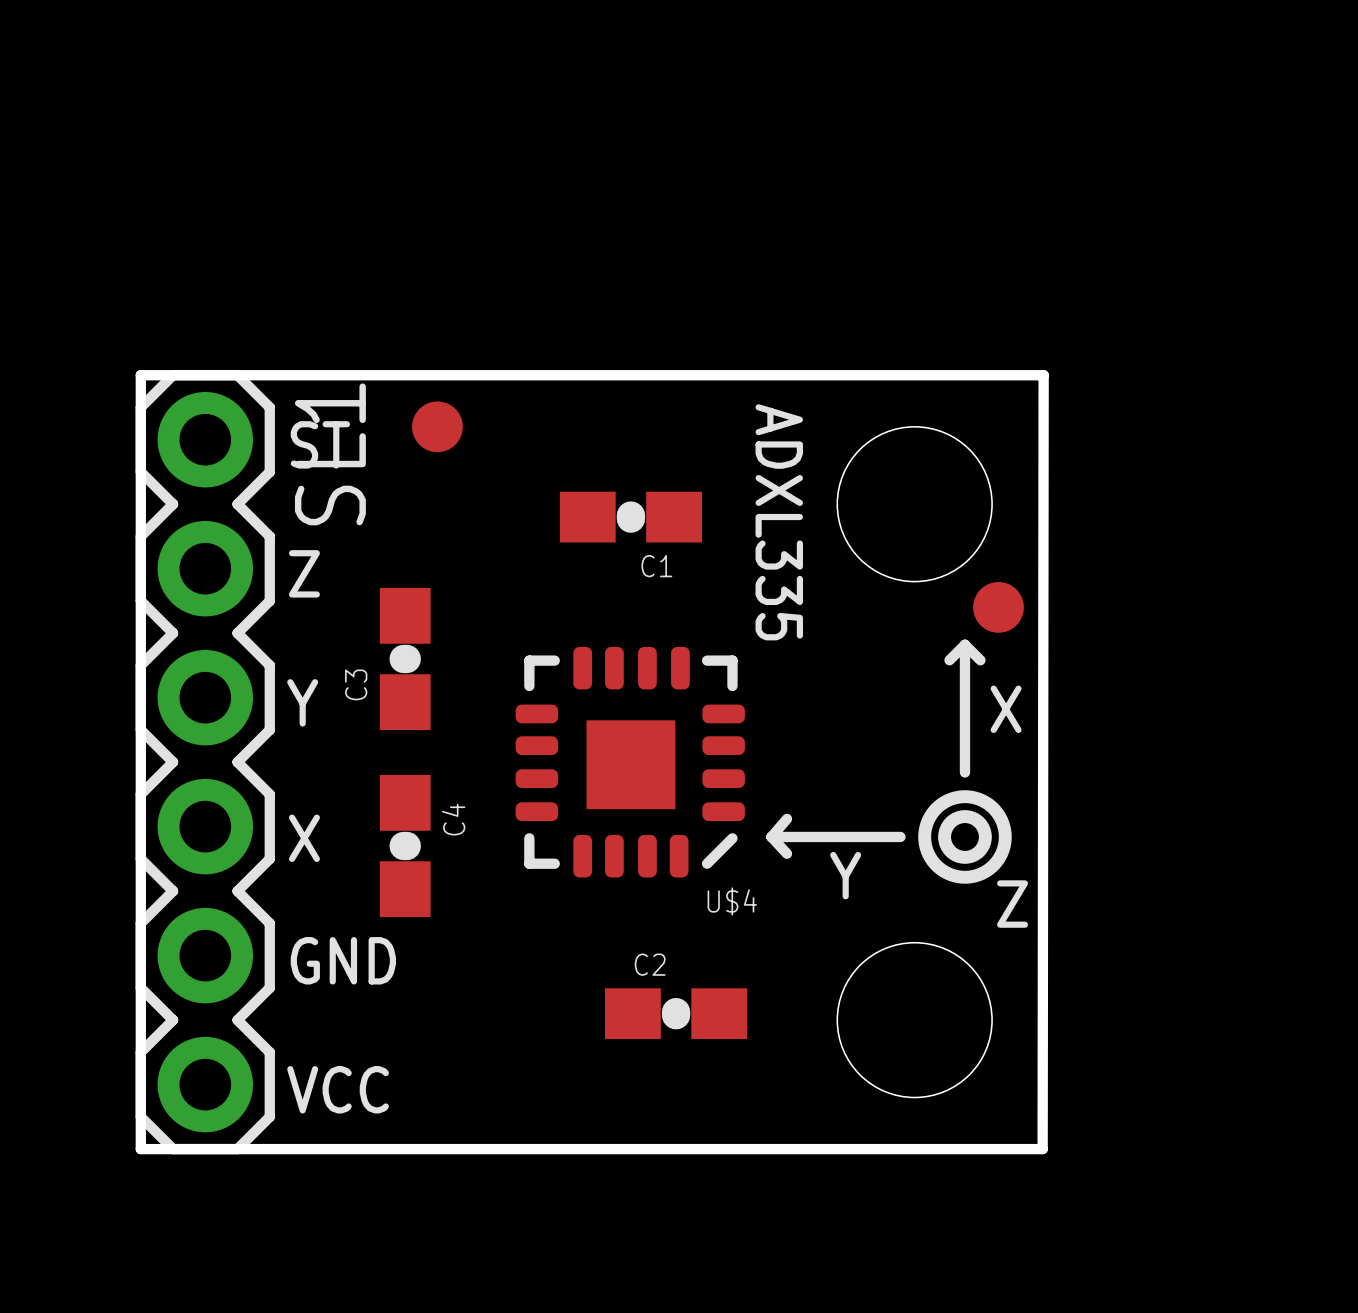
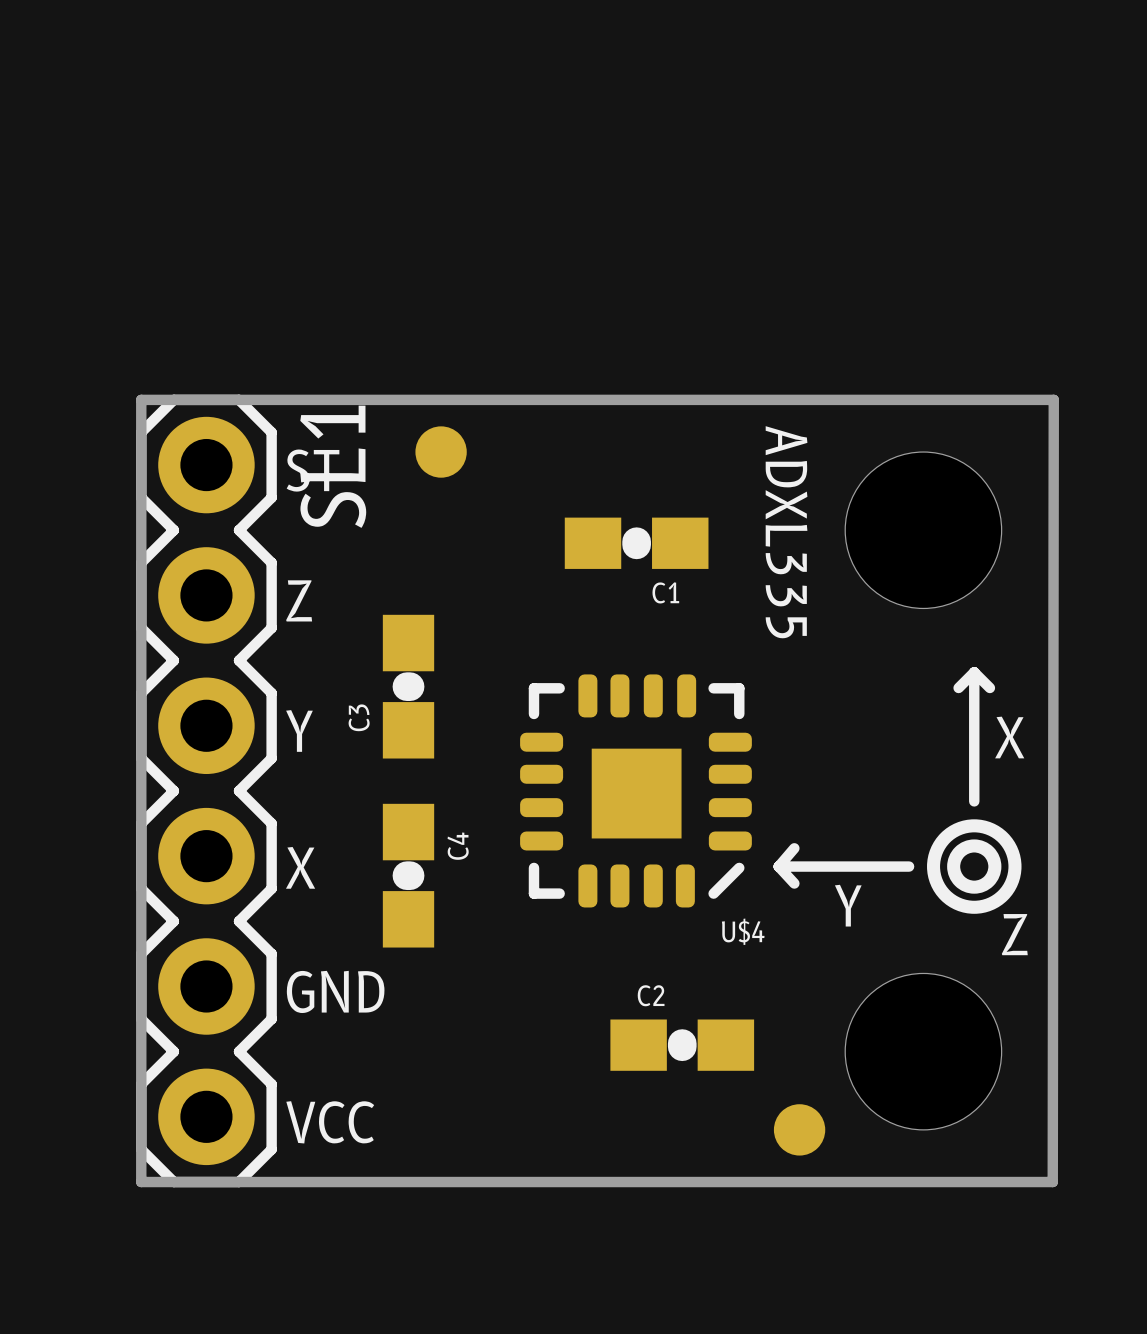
part position: (998, 607) -> (799, 1129)

